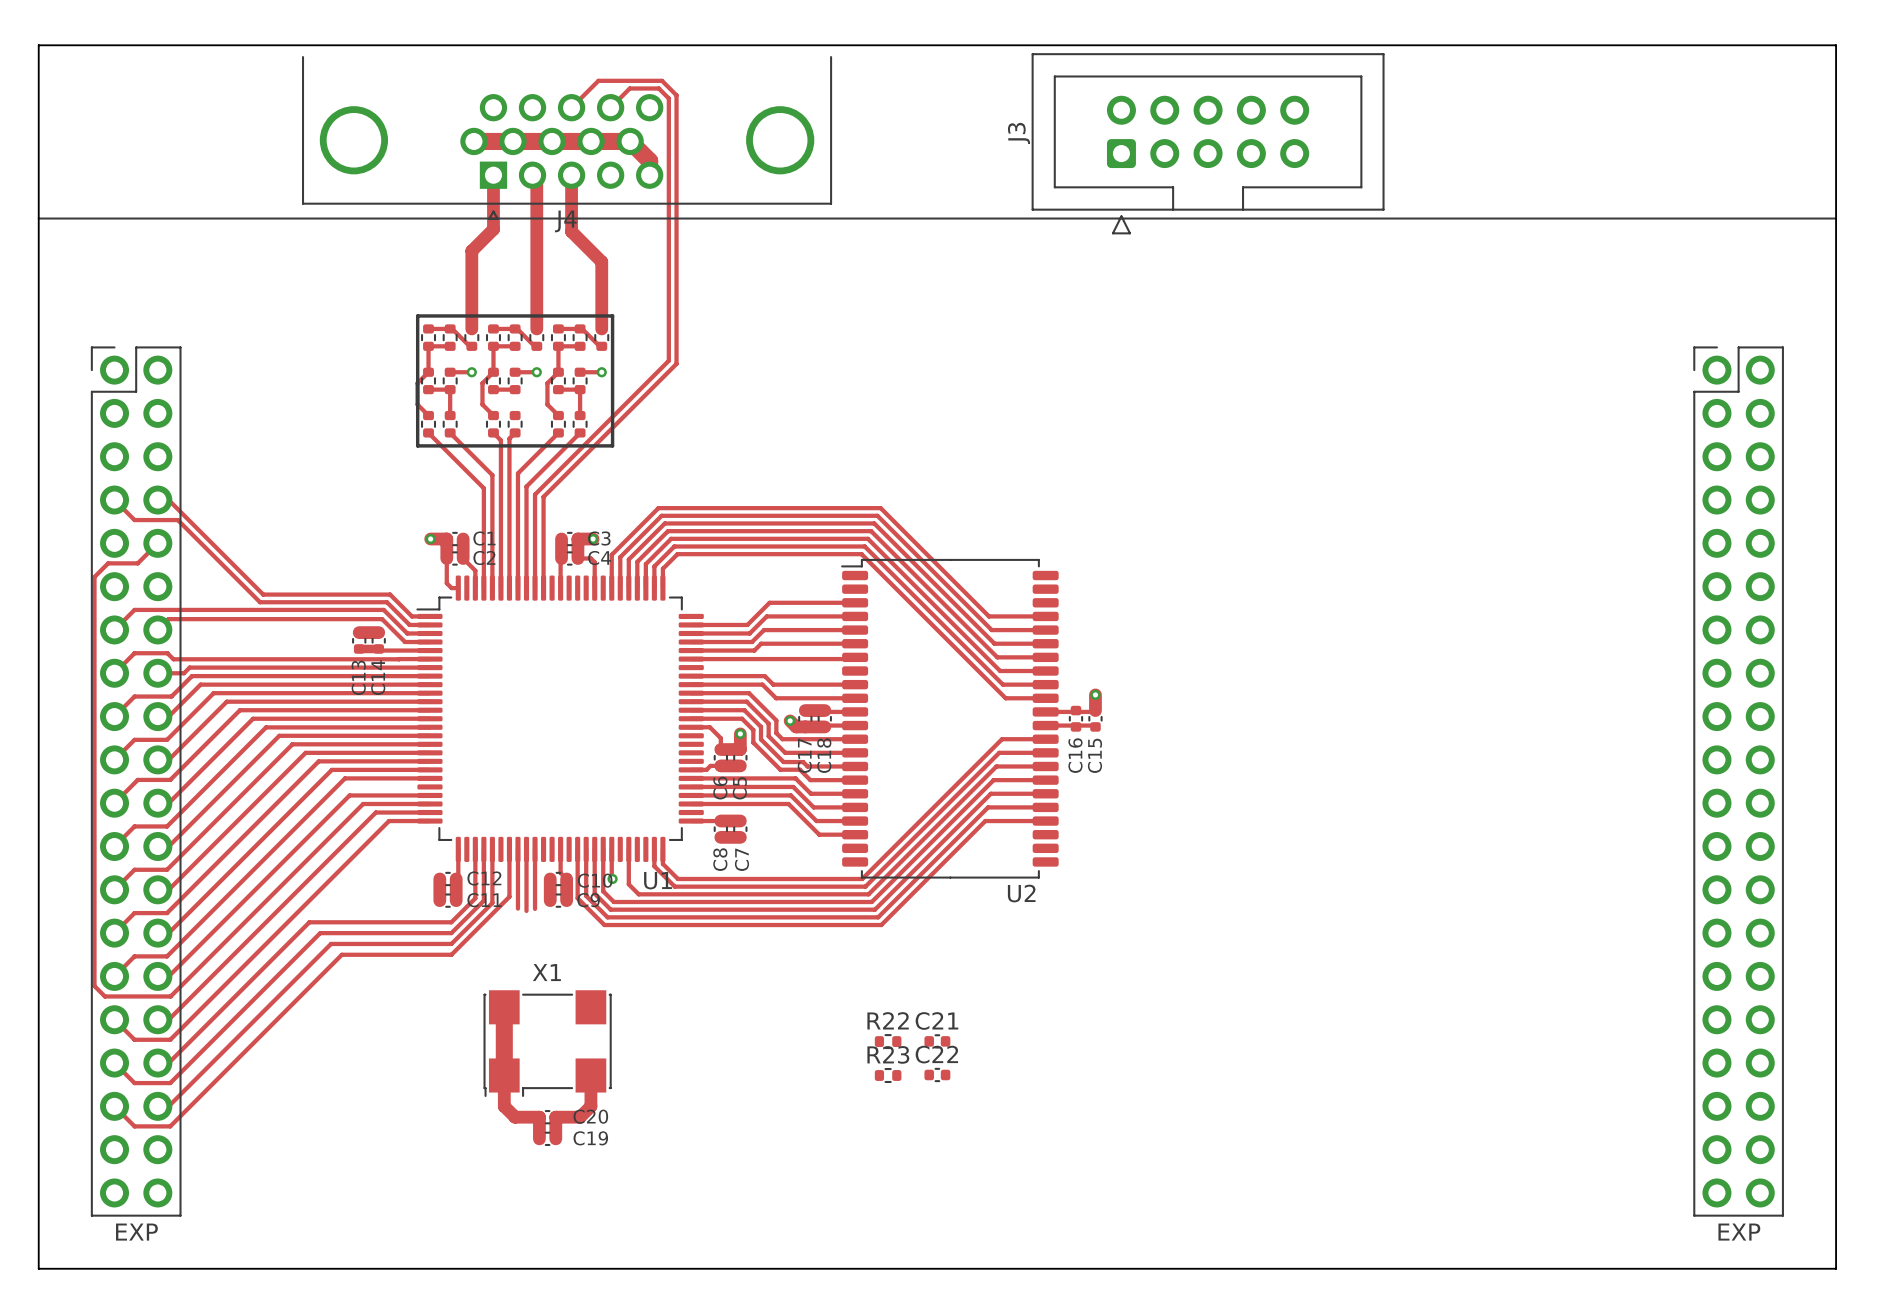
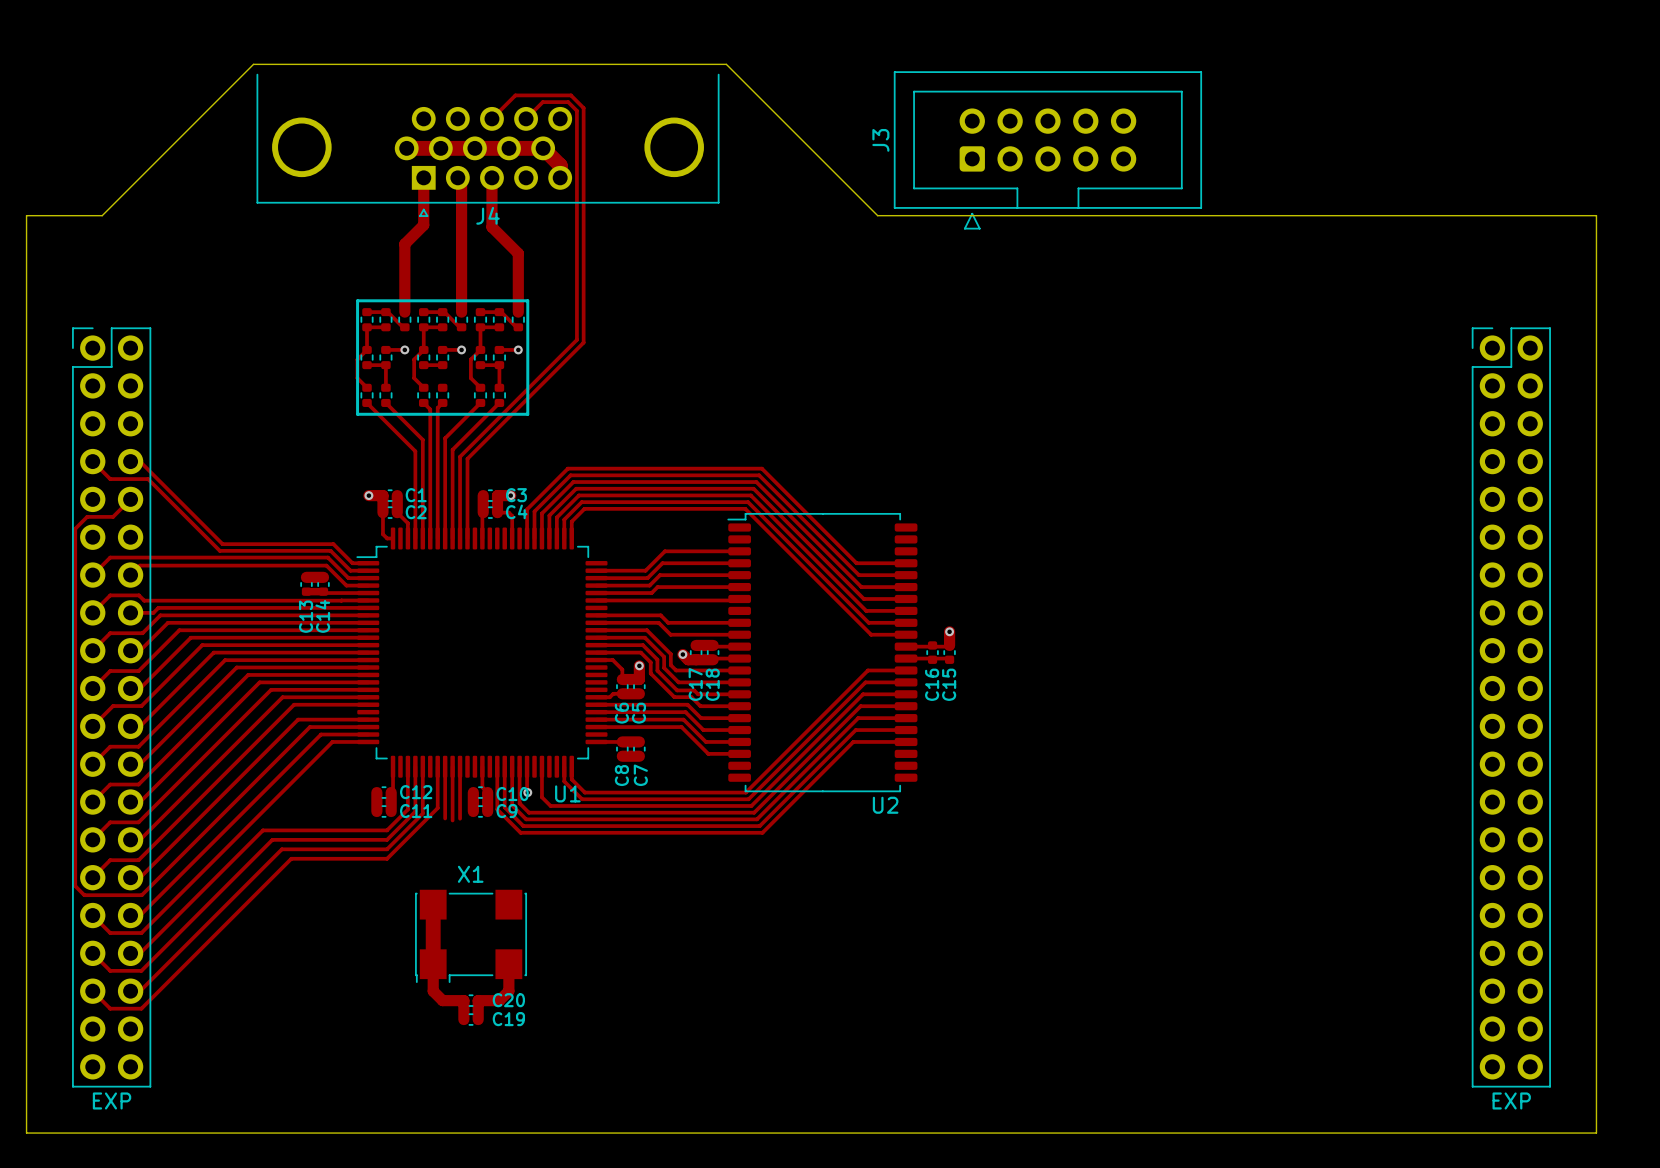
board edge: (298, 45) (38, 45) (38, 218) -> (253, 64) (102, 215) (26, 215)
board edge: (839, 45) (1836, 45) (1836, 218) -> (726, 64) (877, 215) (1596, 215)
line: (38, 218) (1836, 218) -> none
R22: (888, 1041) -> none
C21: (937, 1041) -> none
C22: (937, 1074) -> none
R23: (888, 1075) -> none

